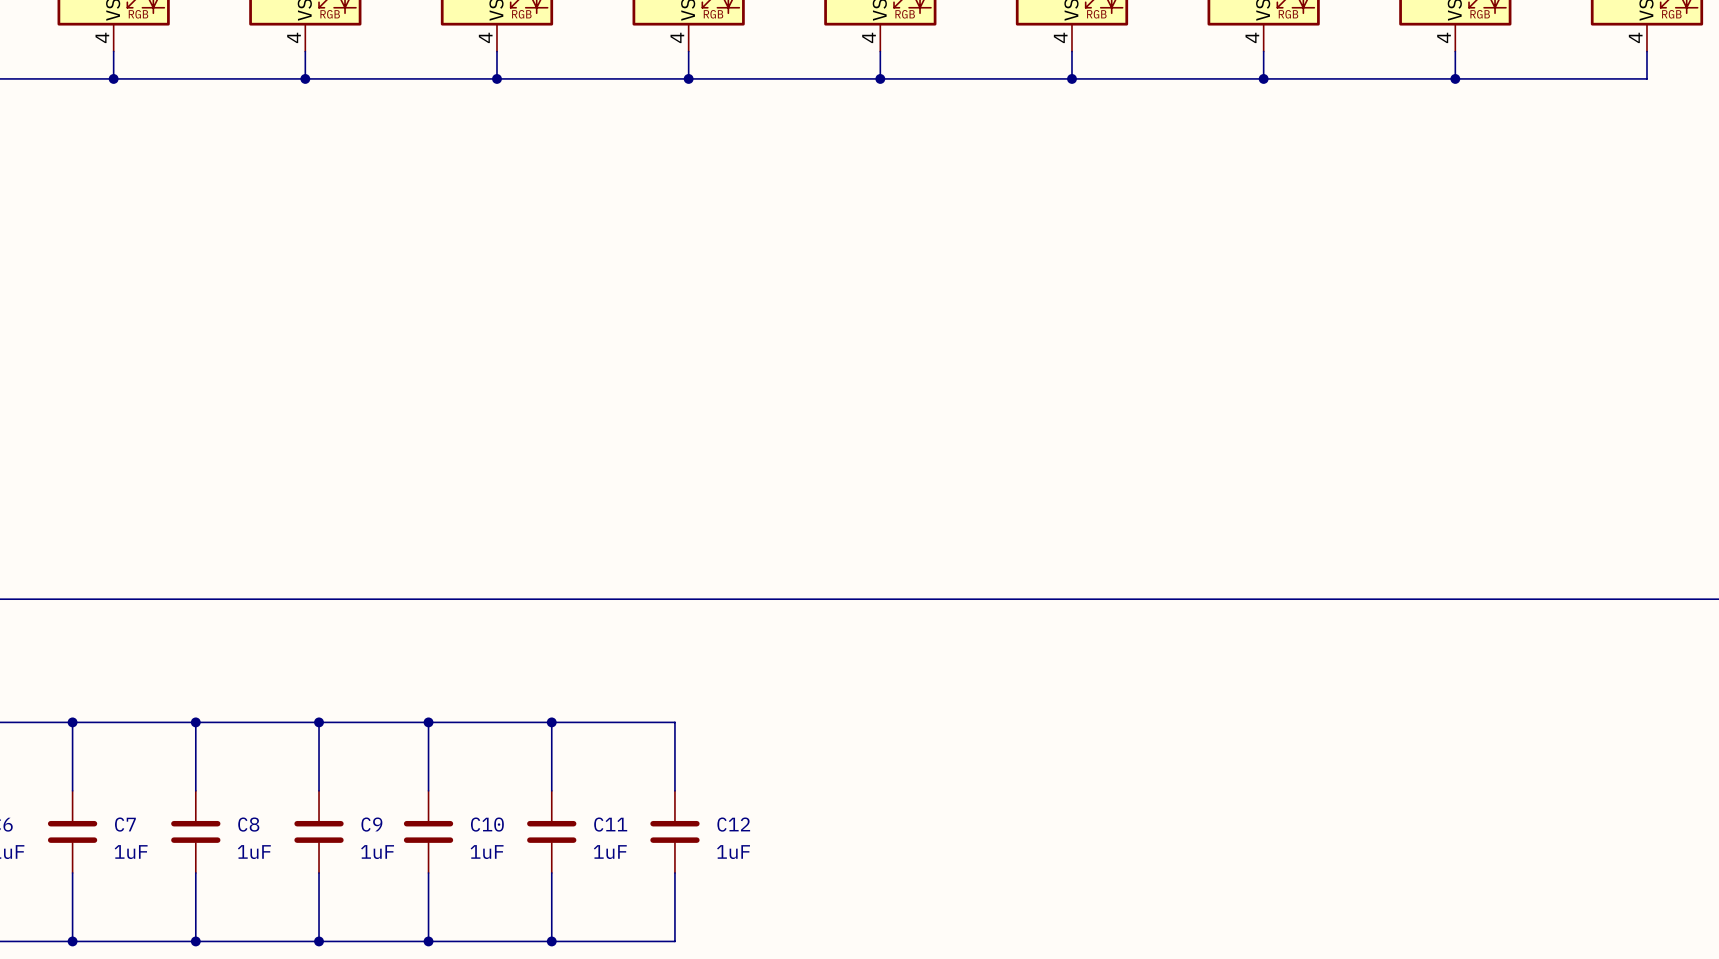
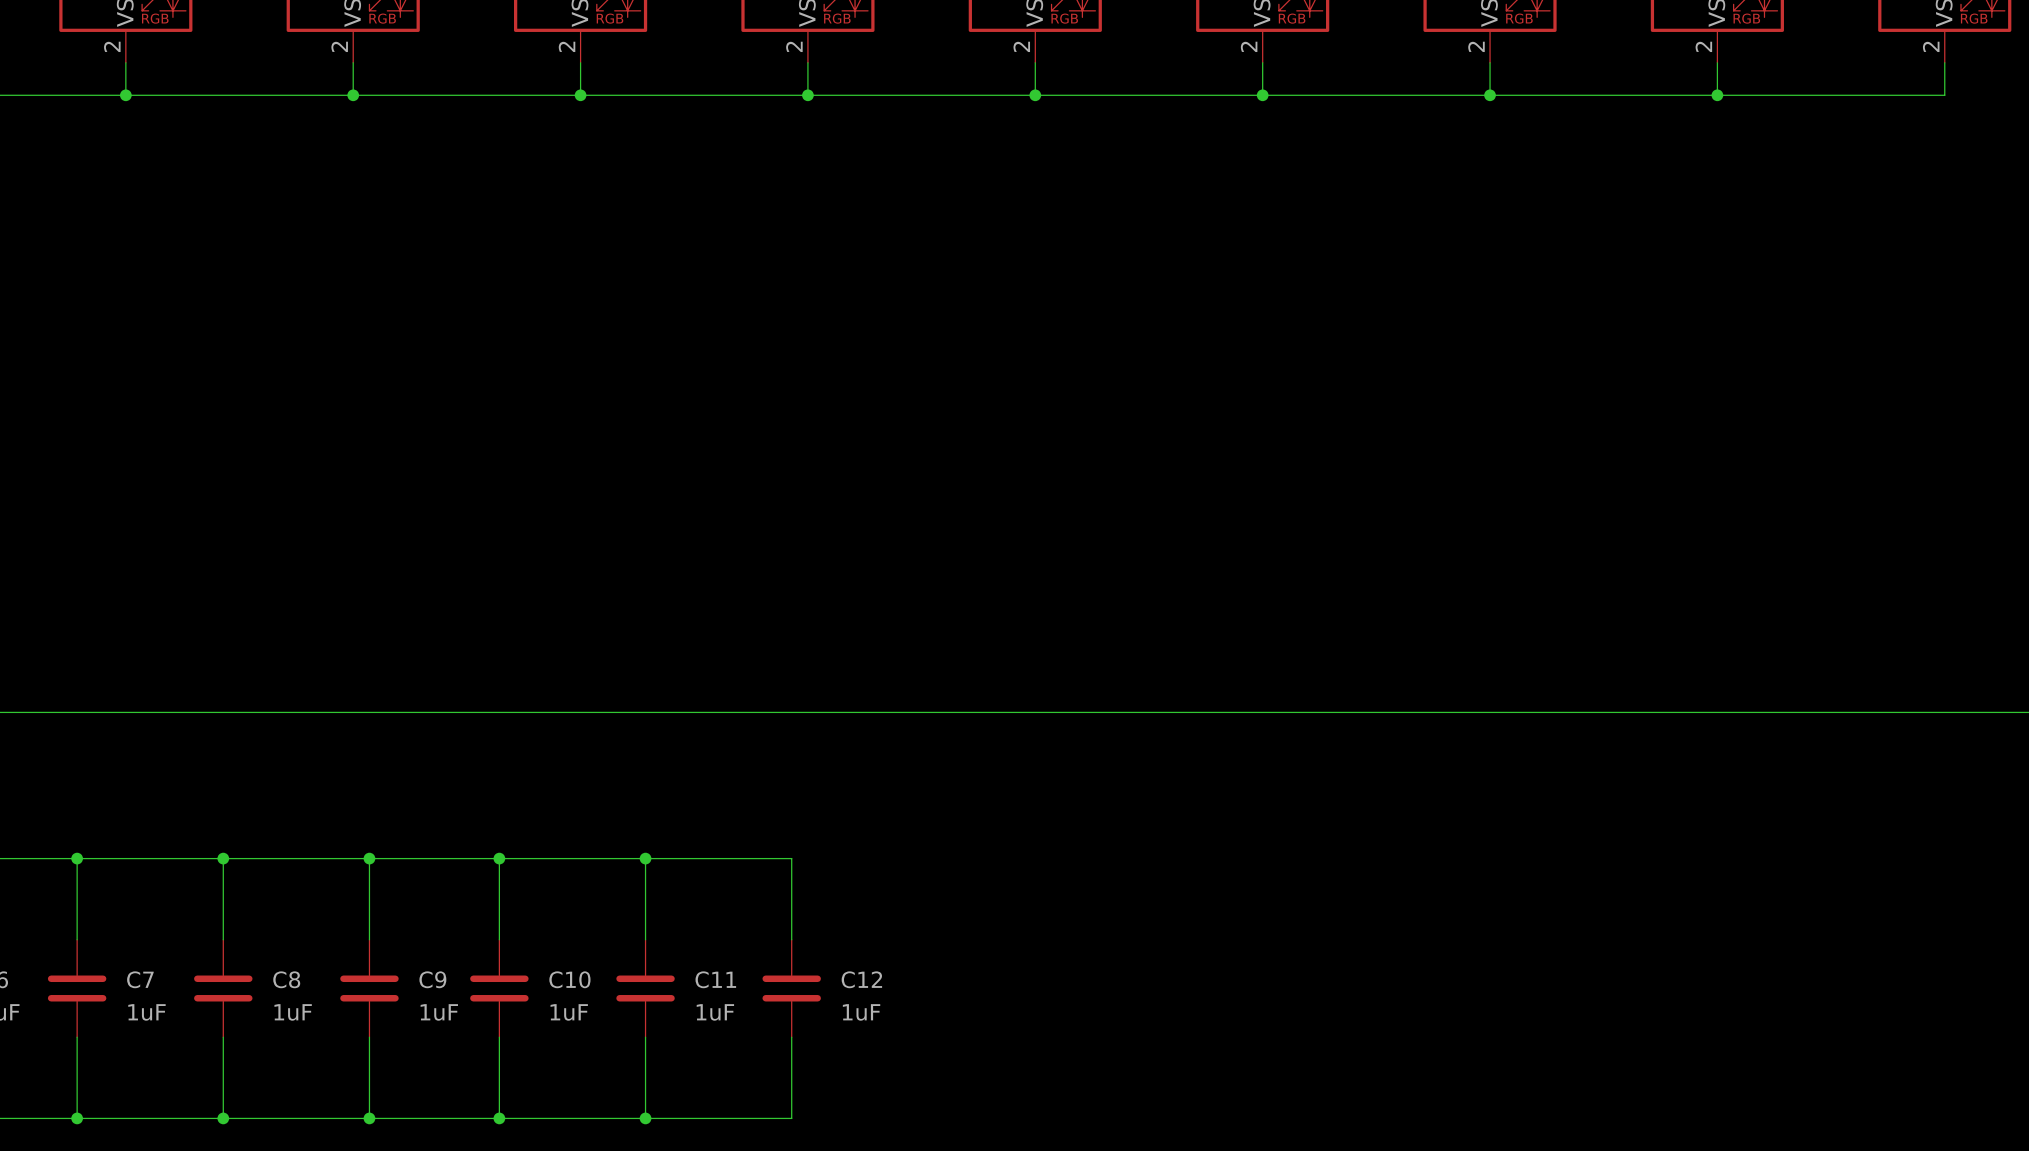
part pin number: 4 (102, 37) -> 2 (112, 46)
part pin number: 4 (294, 37) -> 2 (339, 46)
part pin number: 4 (485, 37) -> 2 (567, 46)
part pin number: 4 (677, 37) -> 2 (794, 46)
part pin number: 4 (869, 37) -> 2 (1021, 46)
part pin number: 4 (1060, 37) -> 2 (1249, 46)
part pin number: 4 (1252, 37) -> 2 (1476, 46)
part pin number: 4 (1444, 37) -> 2 (1703, 46)
part pin number: 4 (1635, 37) -> 2 (1931, 46)

